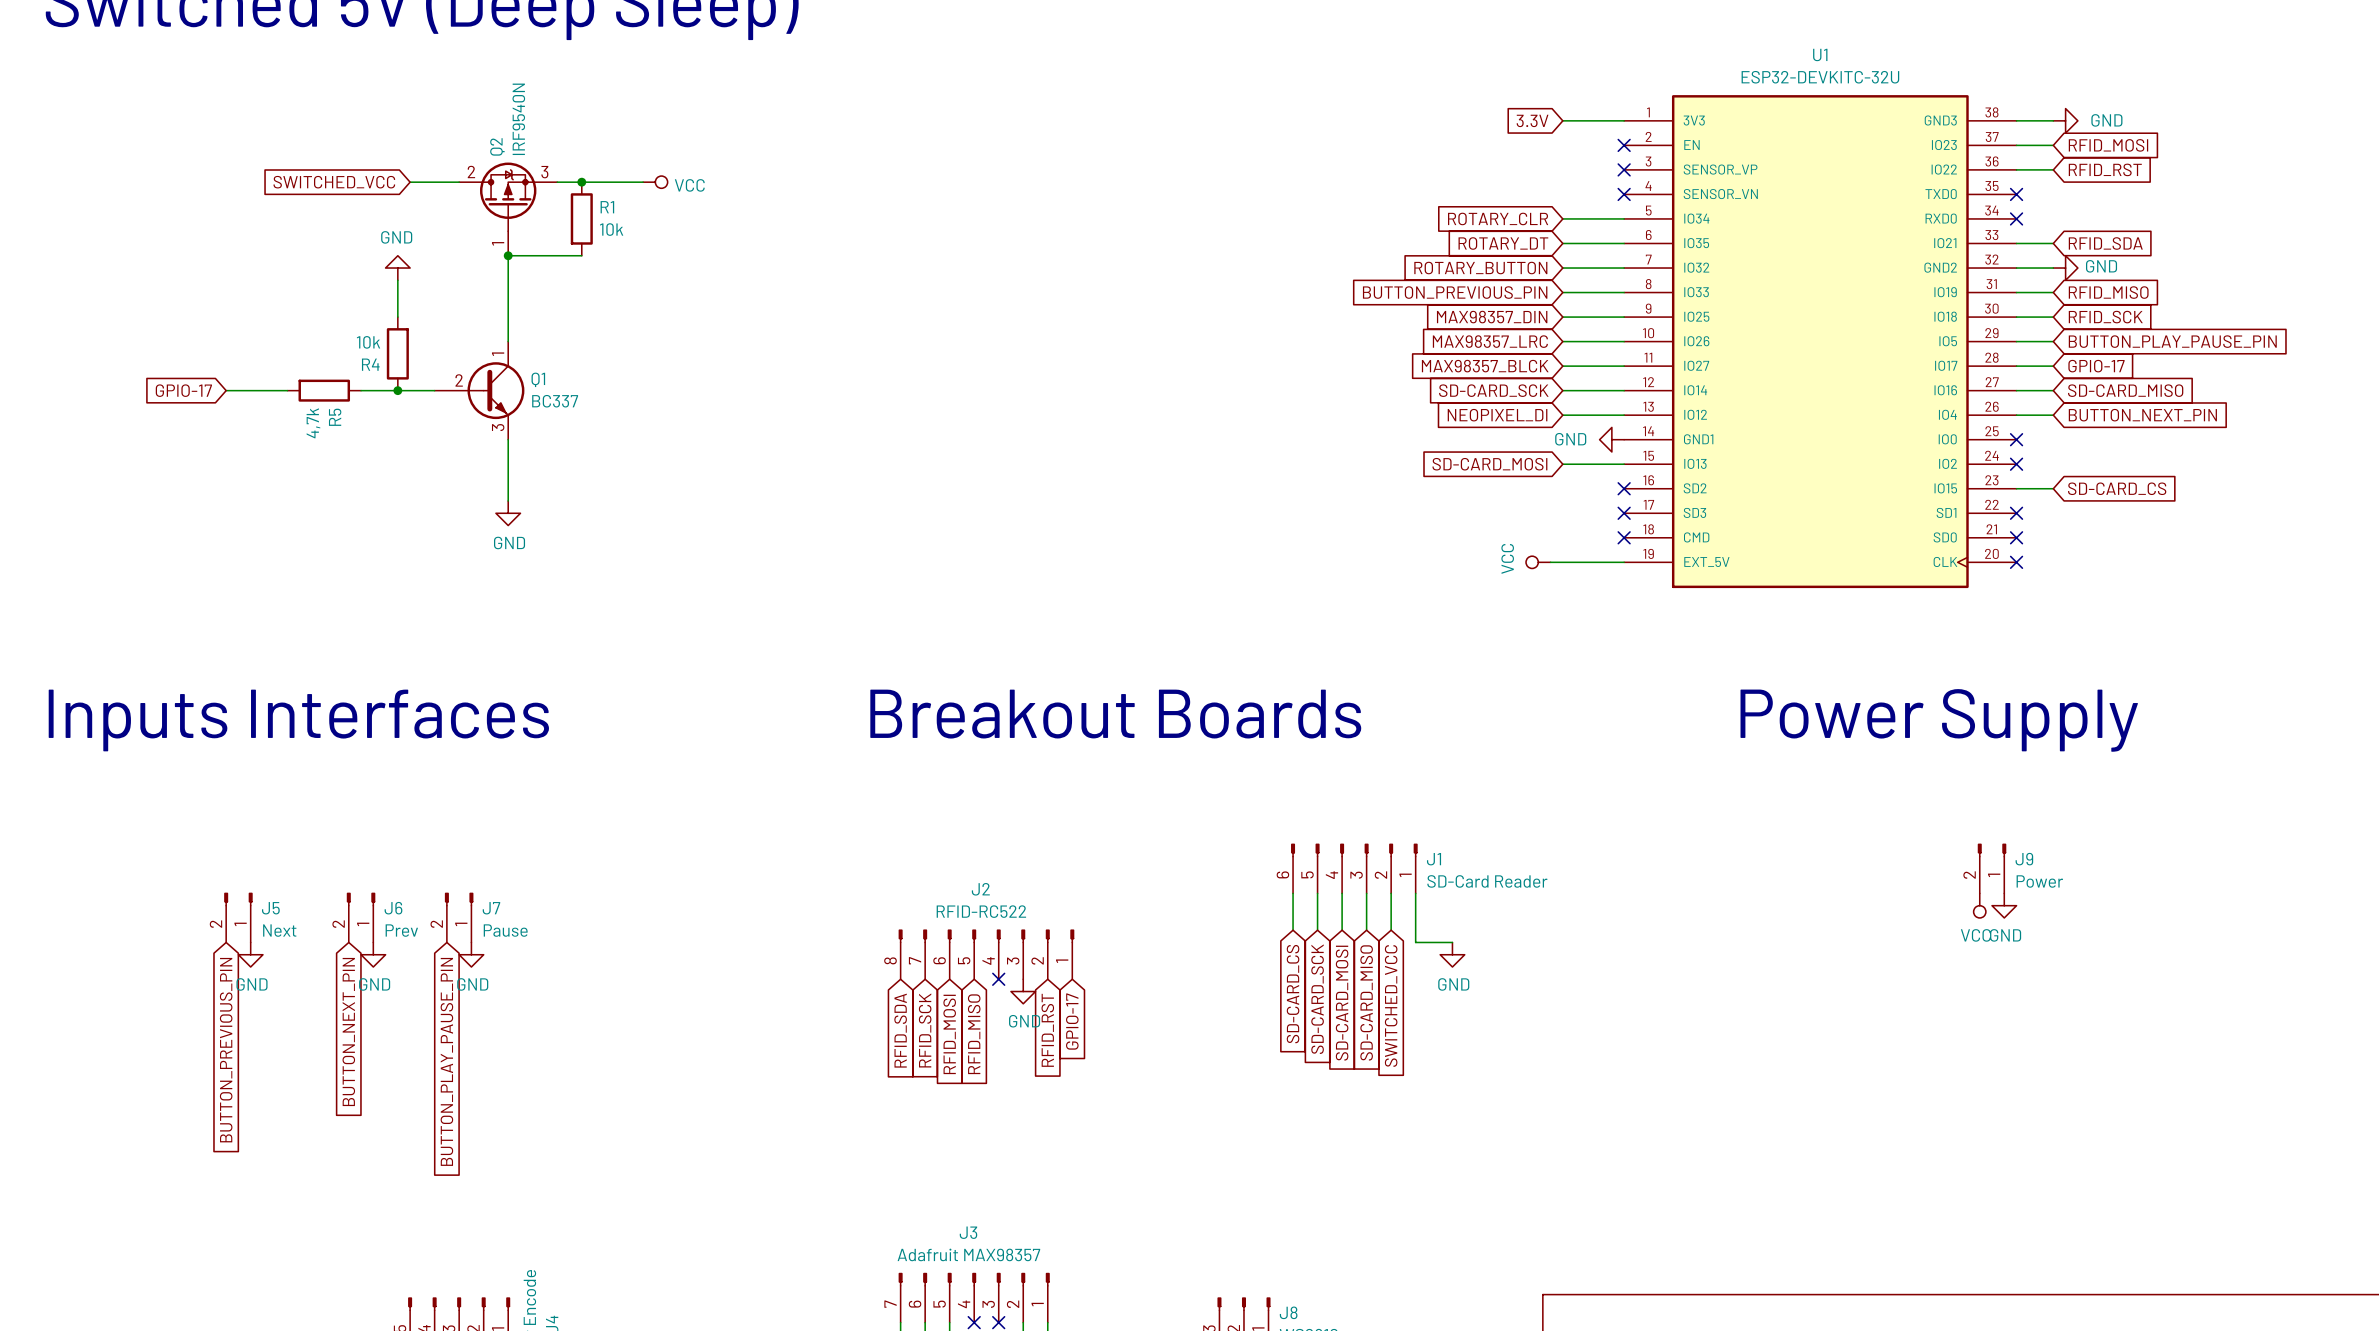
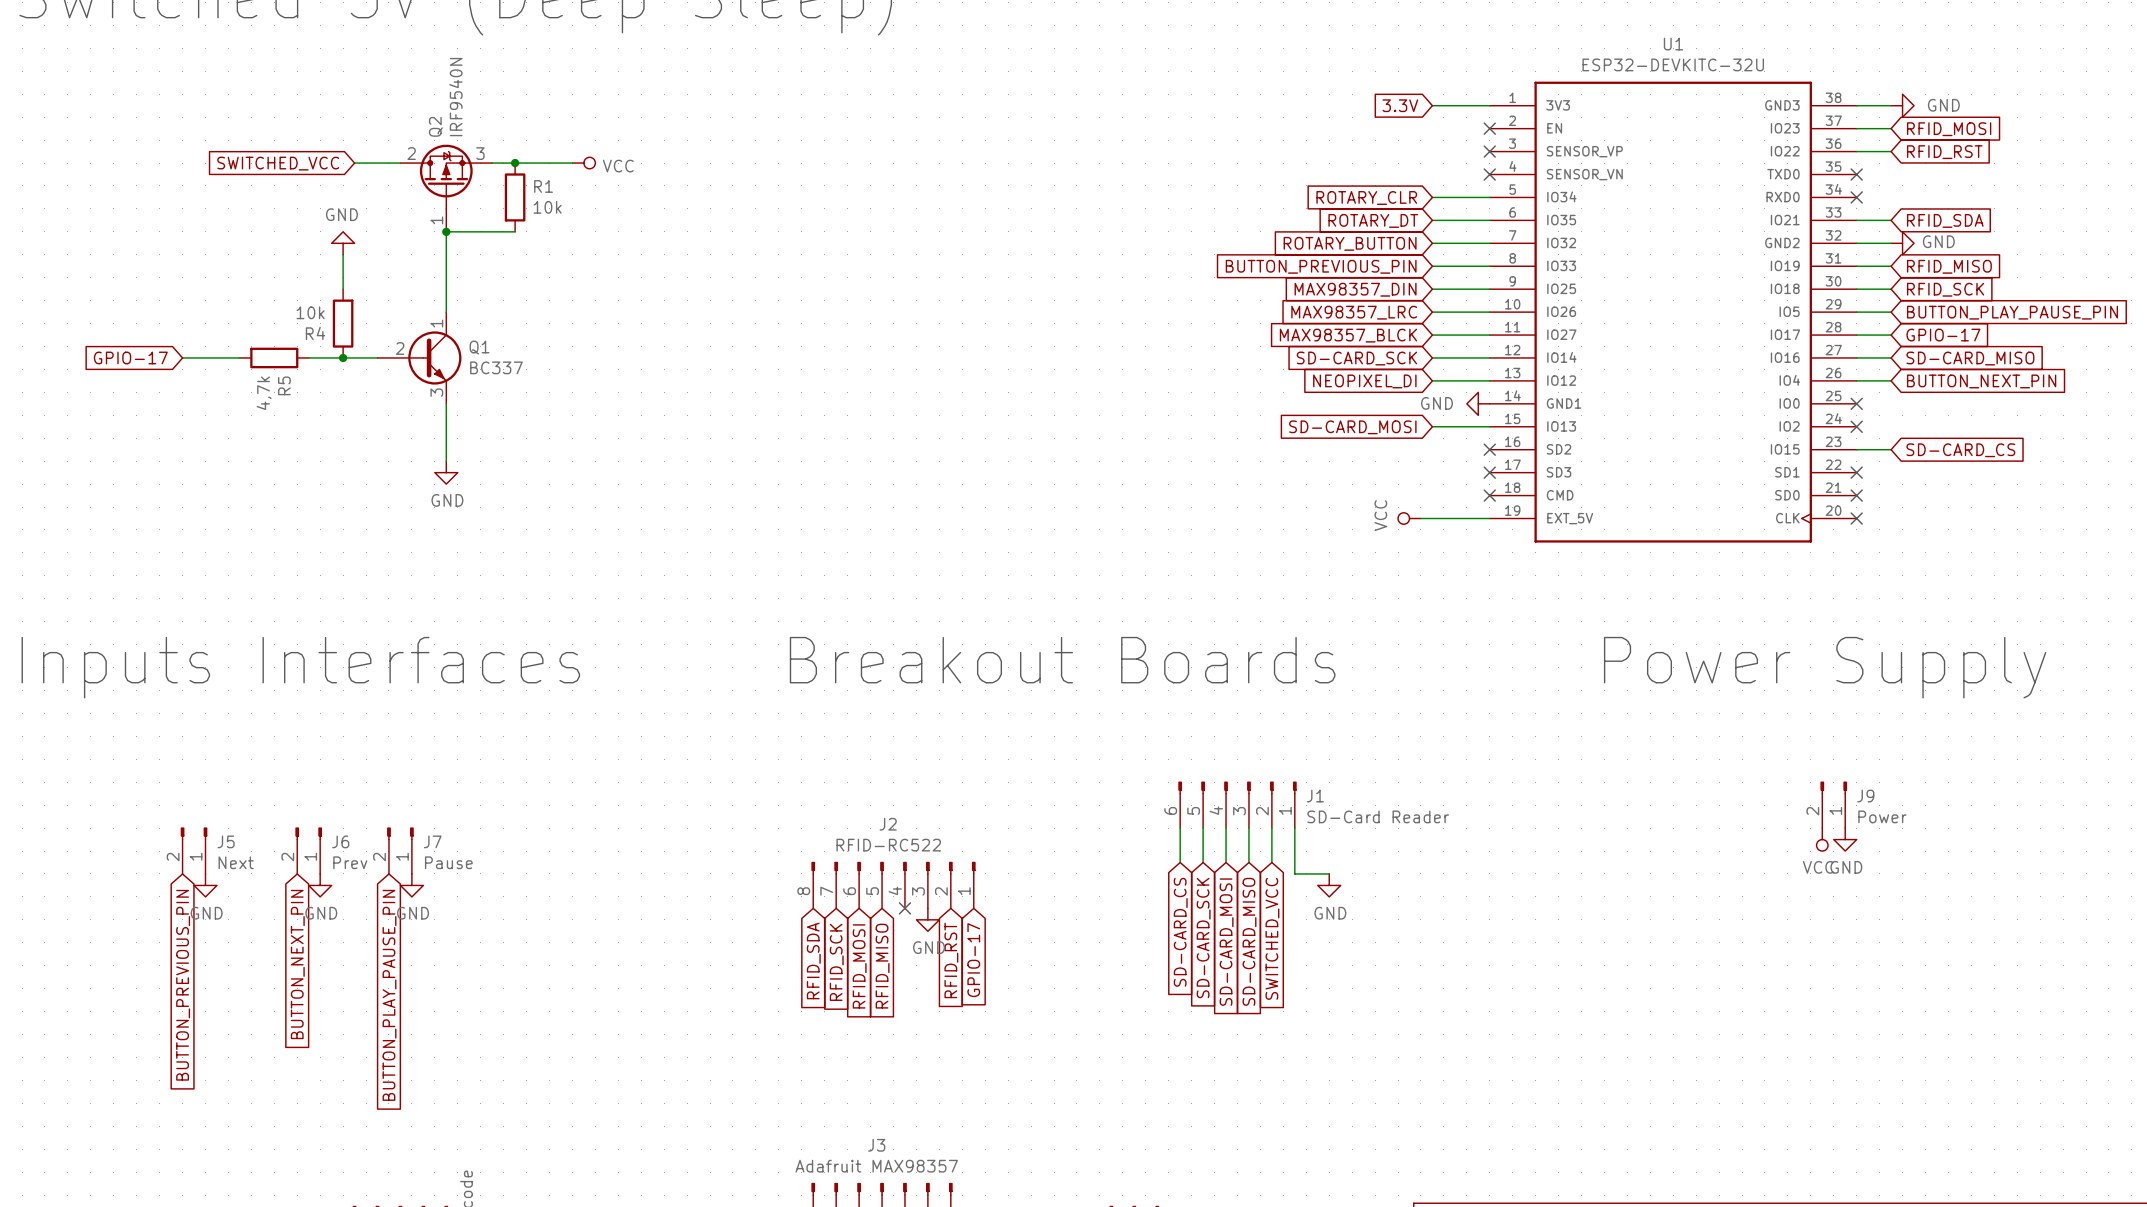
U1 symbol: [1624, 95, 2017, 589] -> [1489, 81, 1857, 543]

